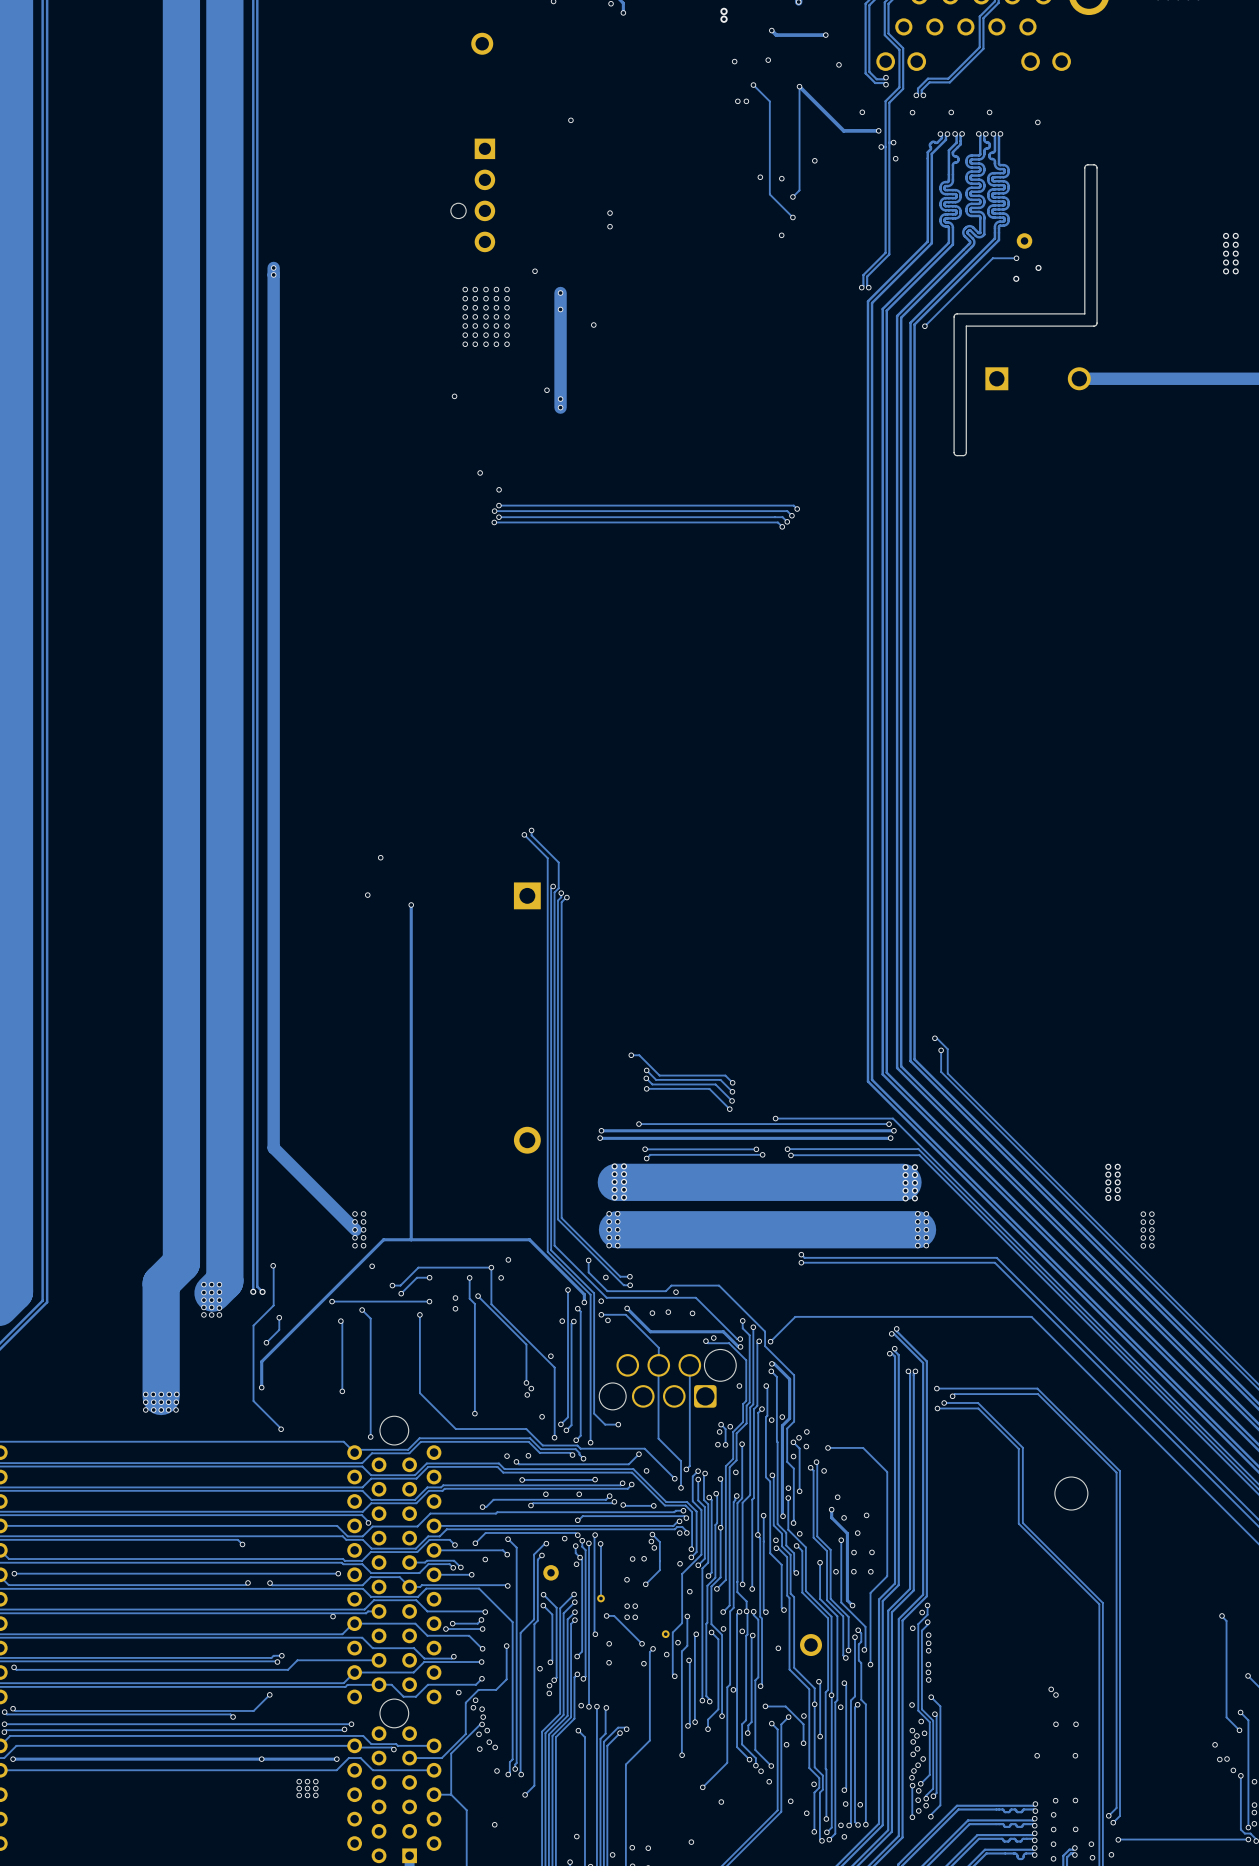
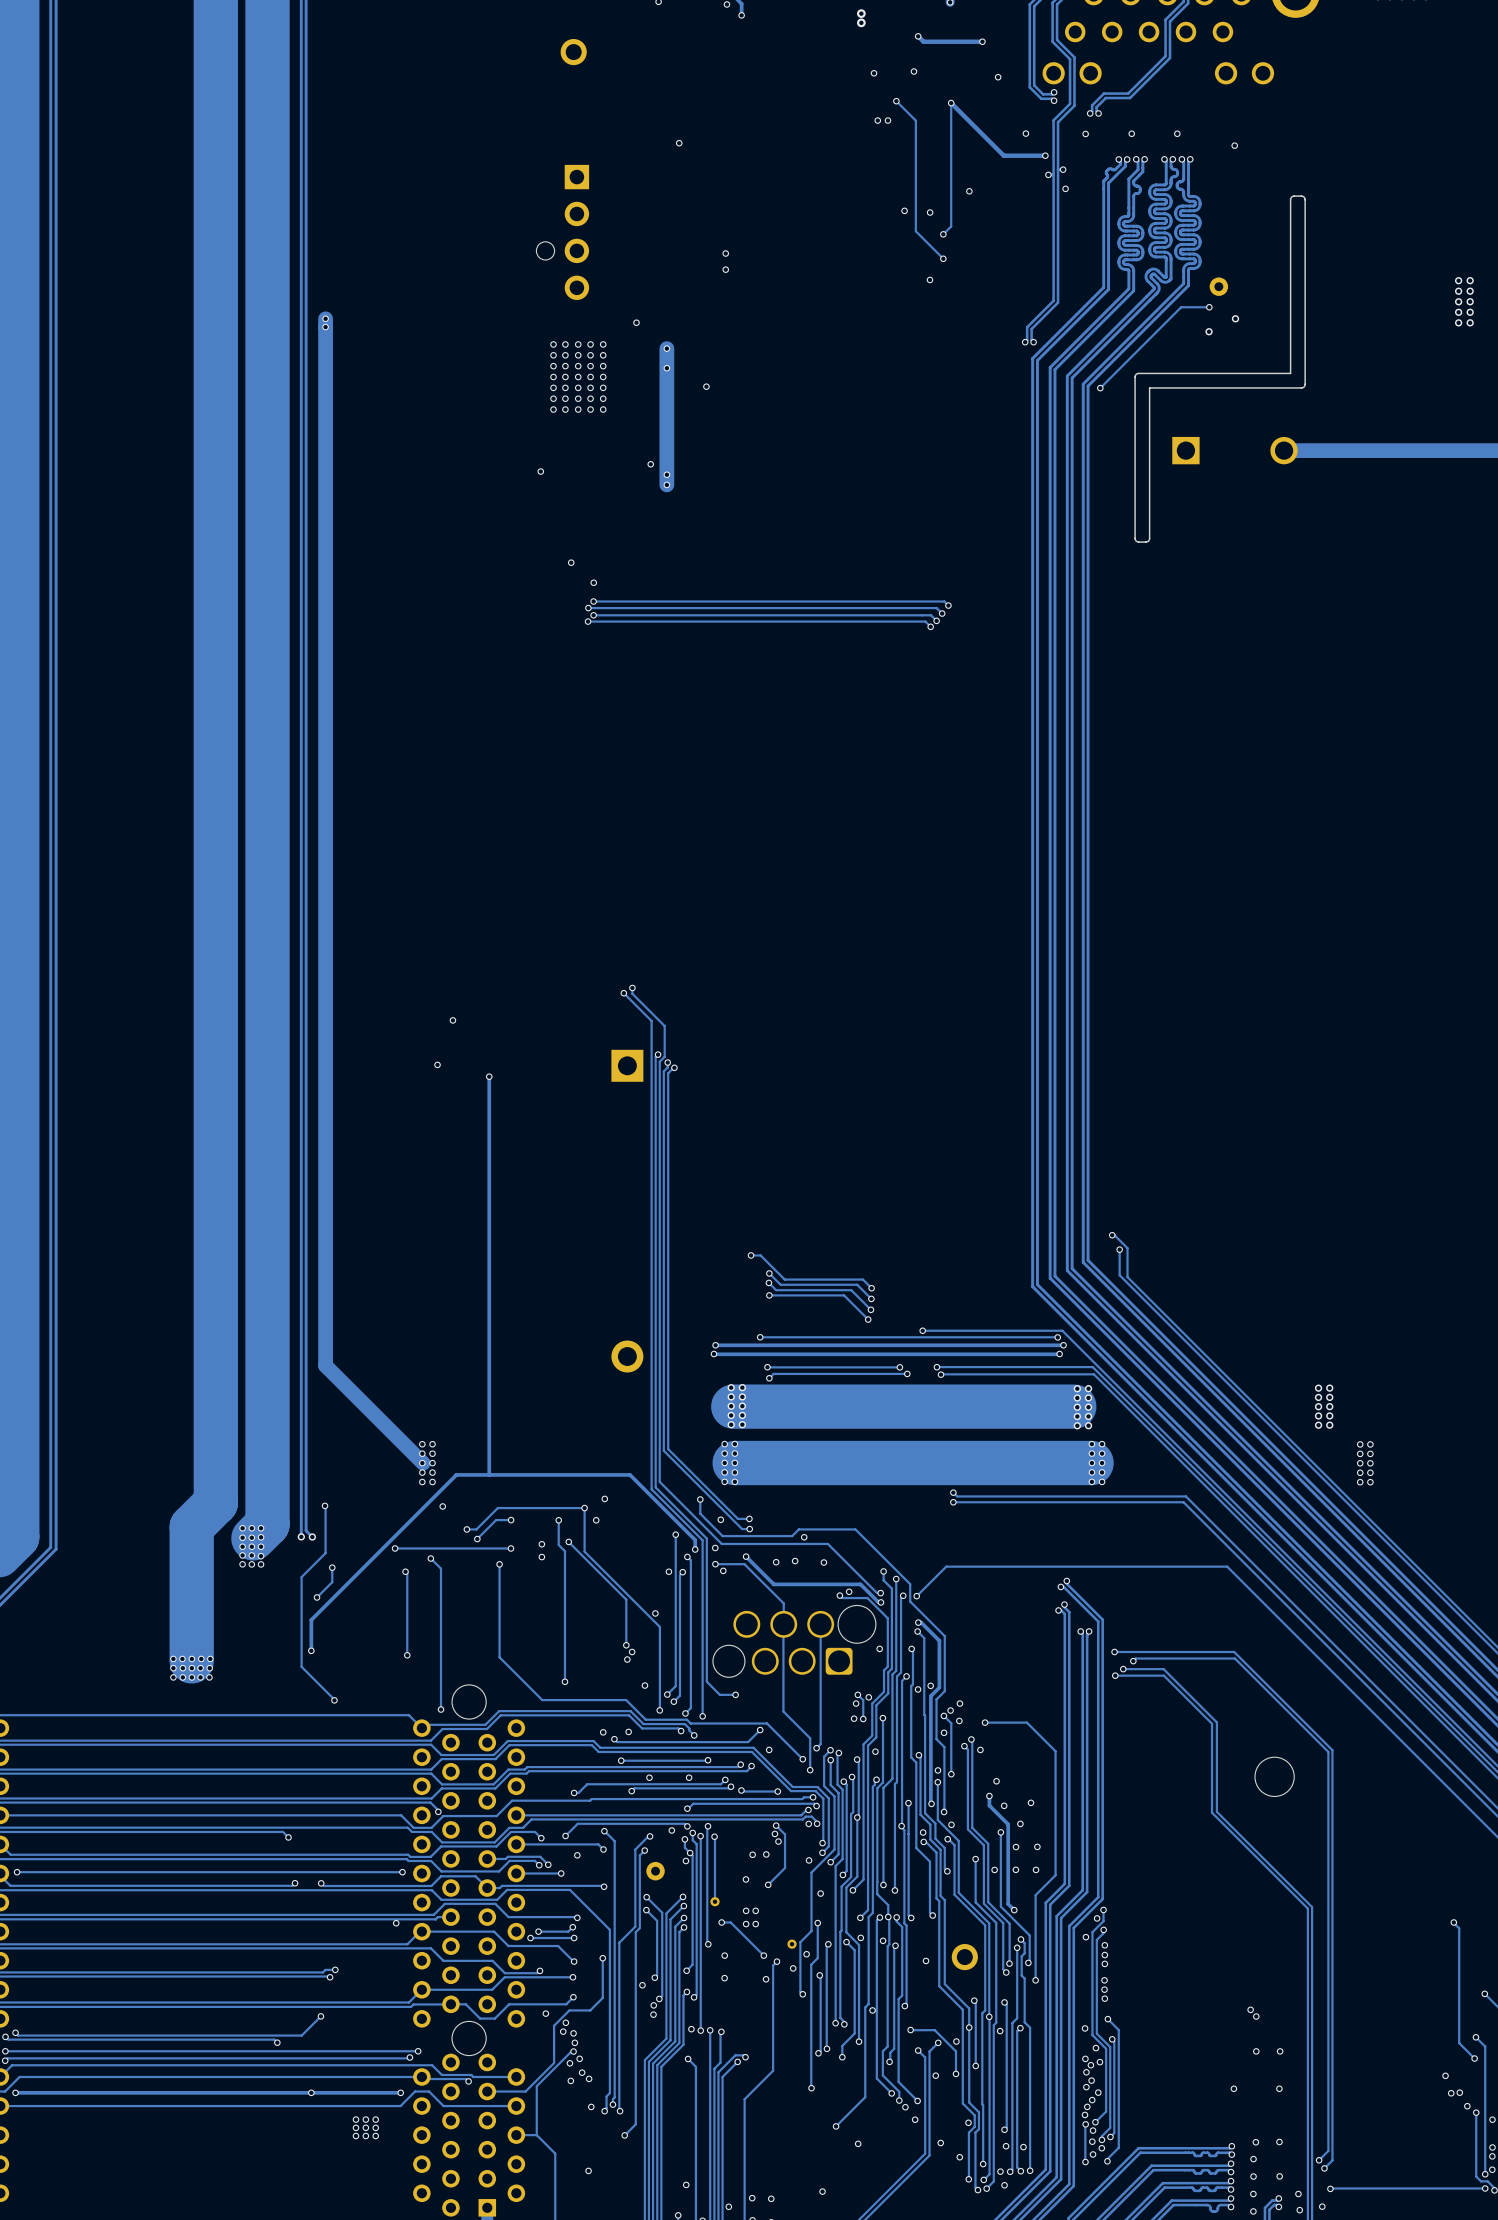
track: (379, 1660) (297, 1660) (287, 1669) (16, 1669) (14, 1667) -> none
via: (14, 1667) -> none

